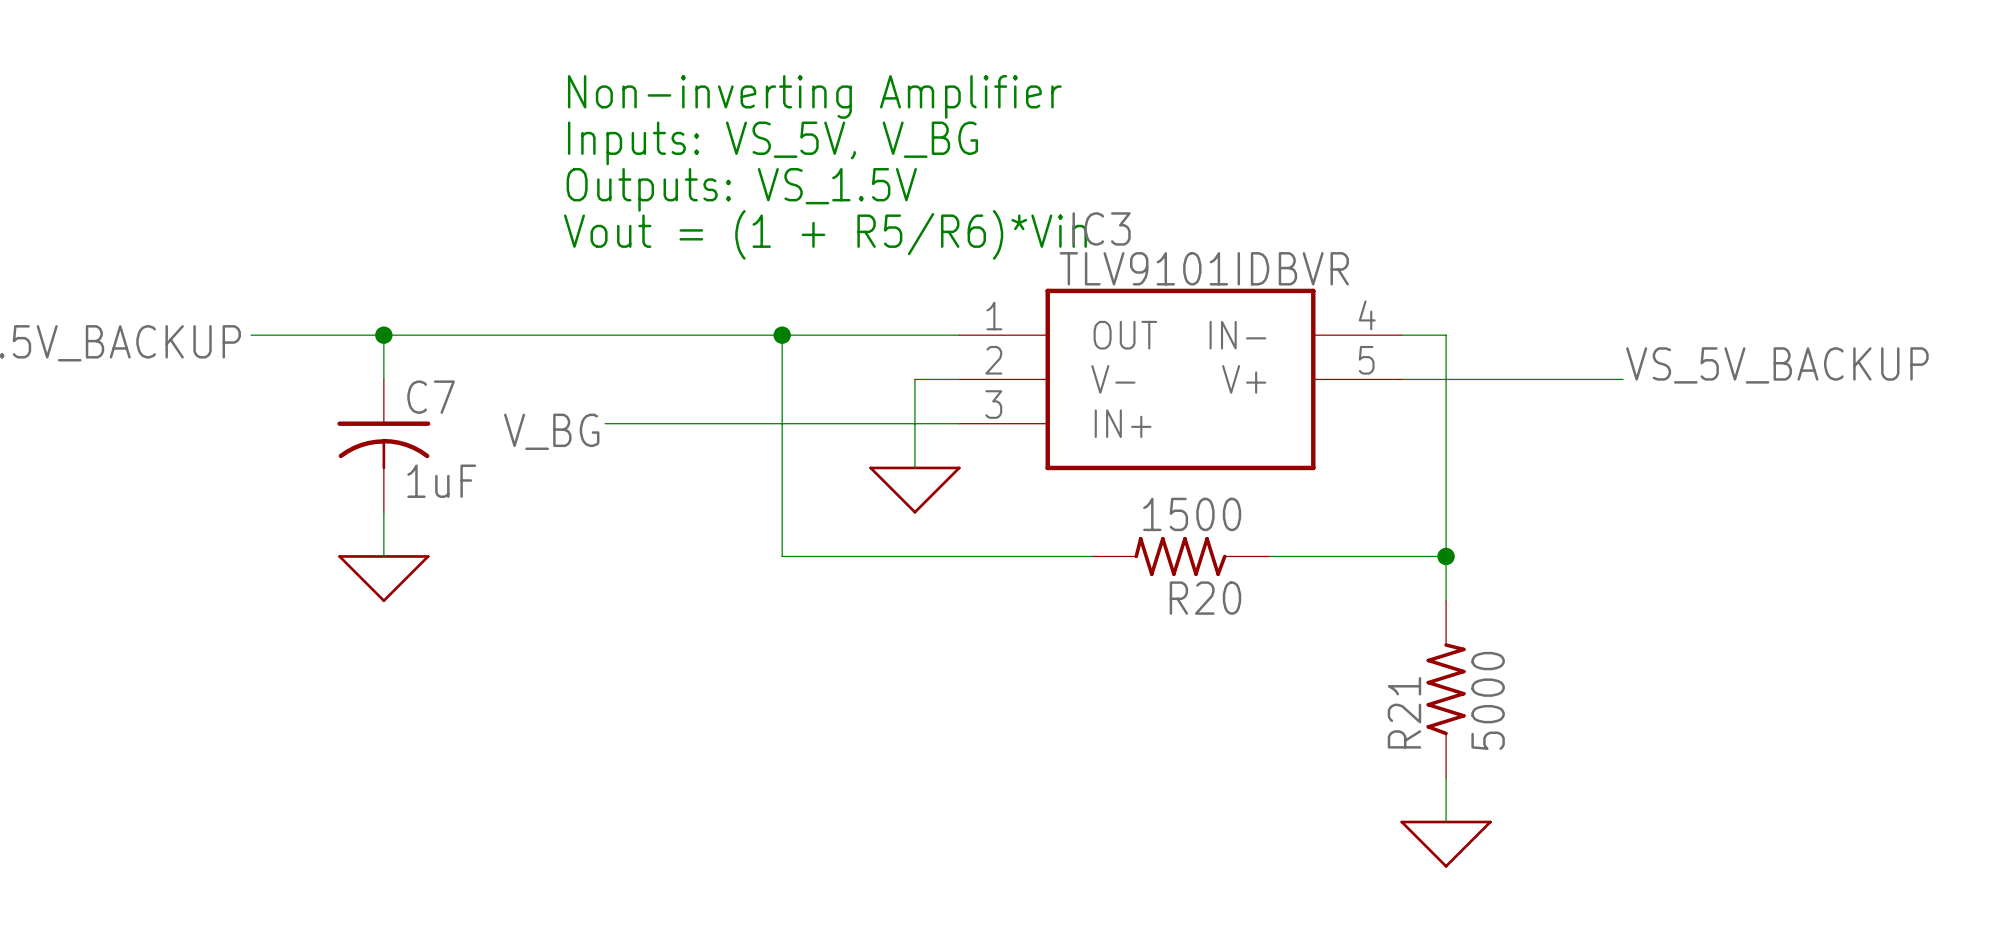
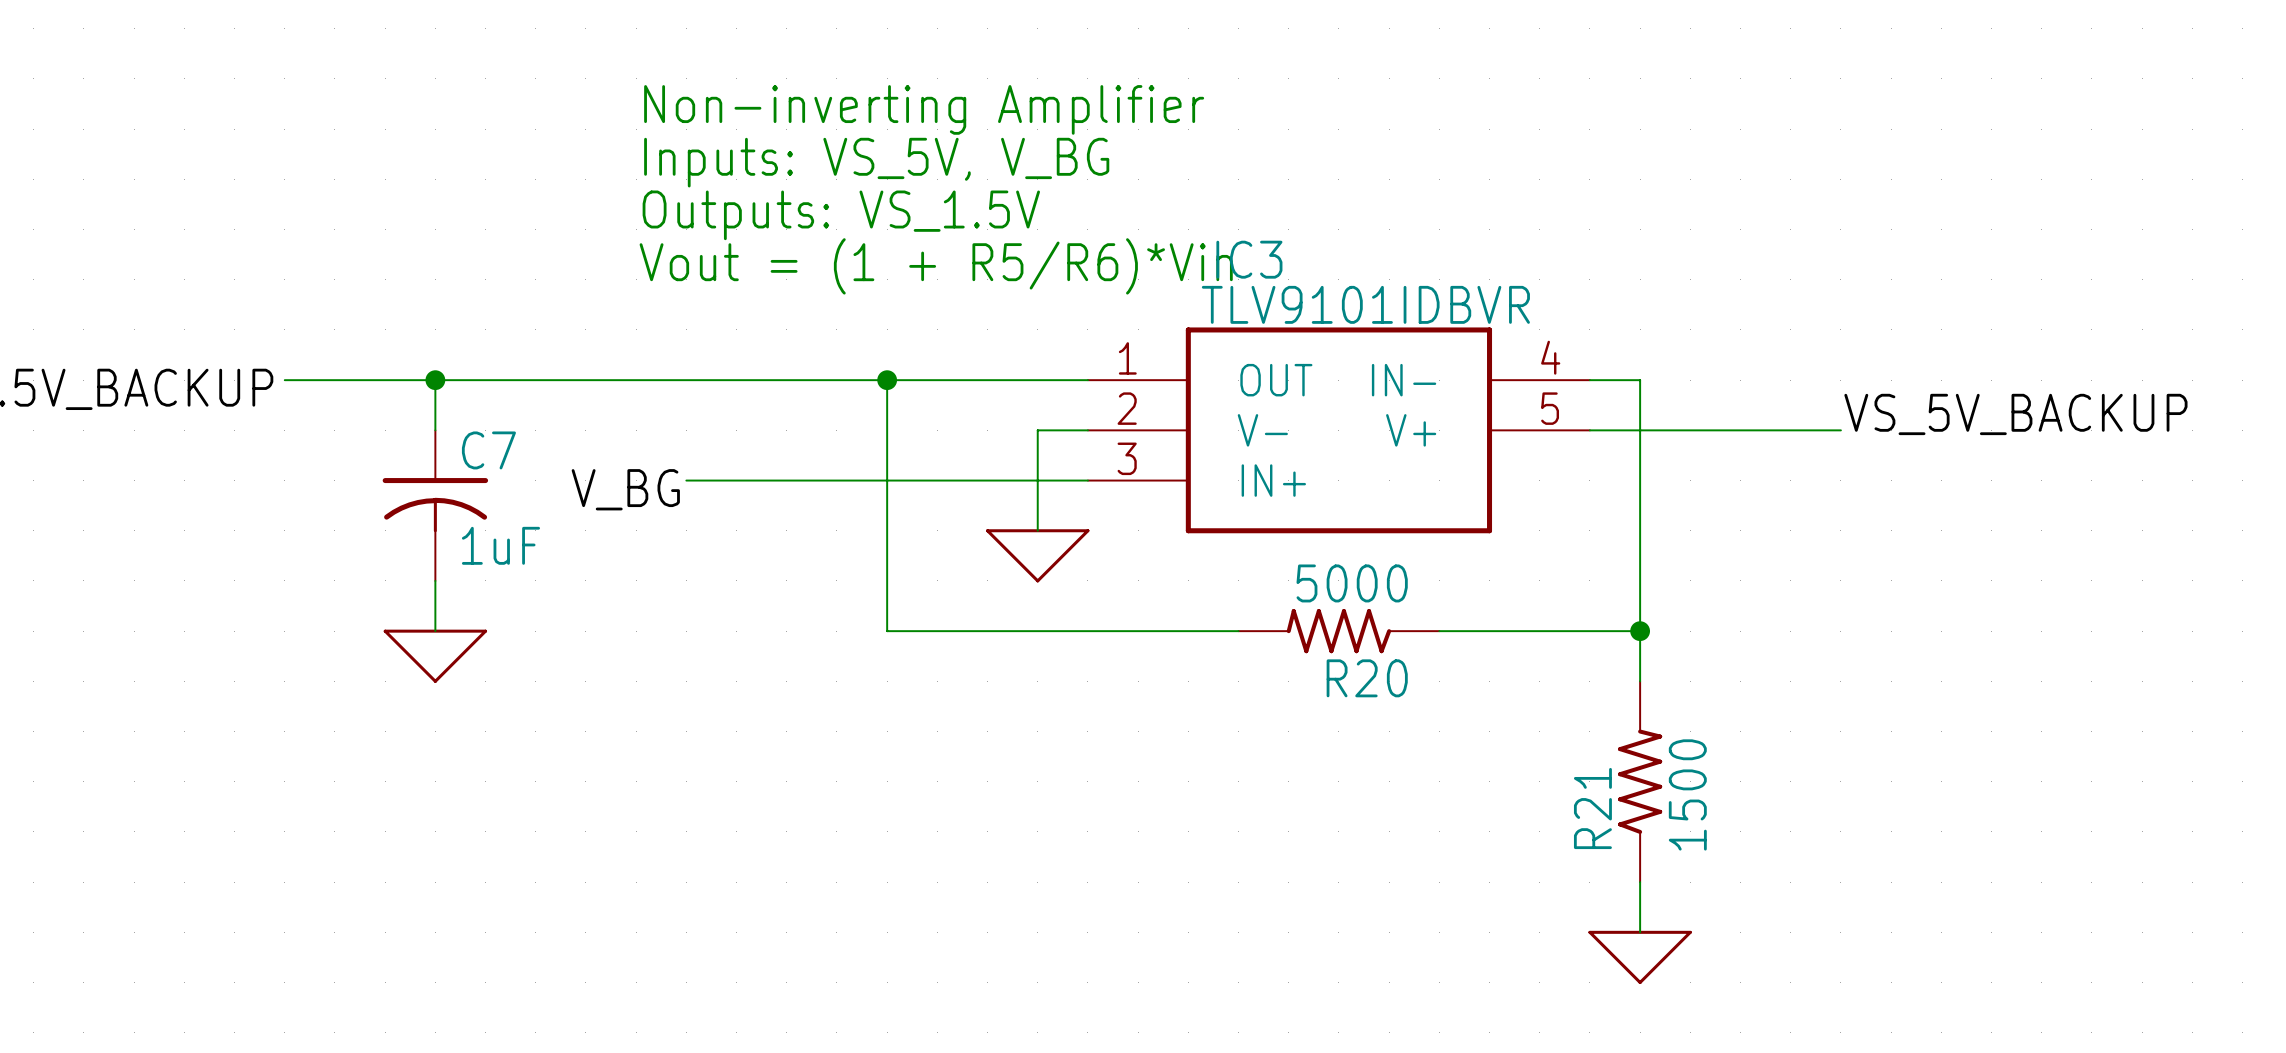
R20 value: 1500 (1192, 514) -> 5000 (1352, 583)
R21 value: 5000 (1488, 700) -> 1500 (1687, 794)

